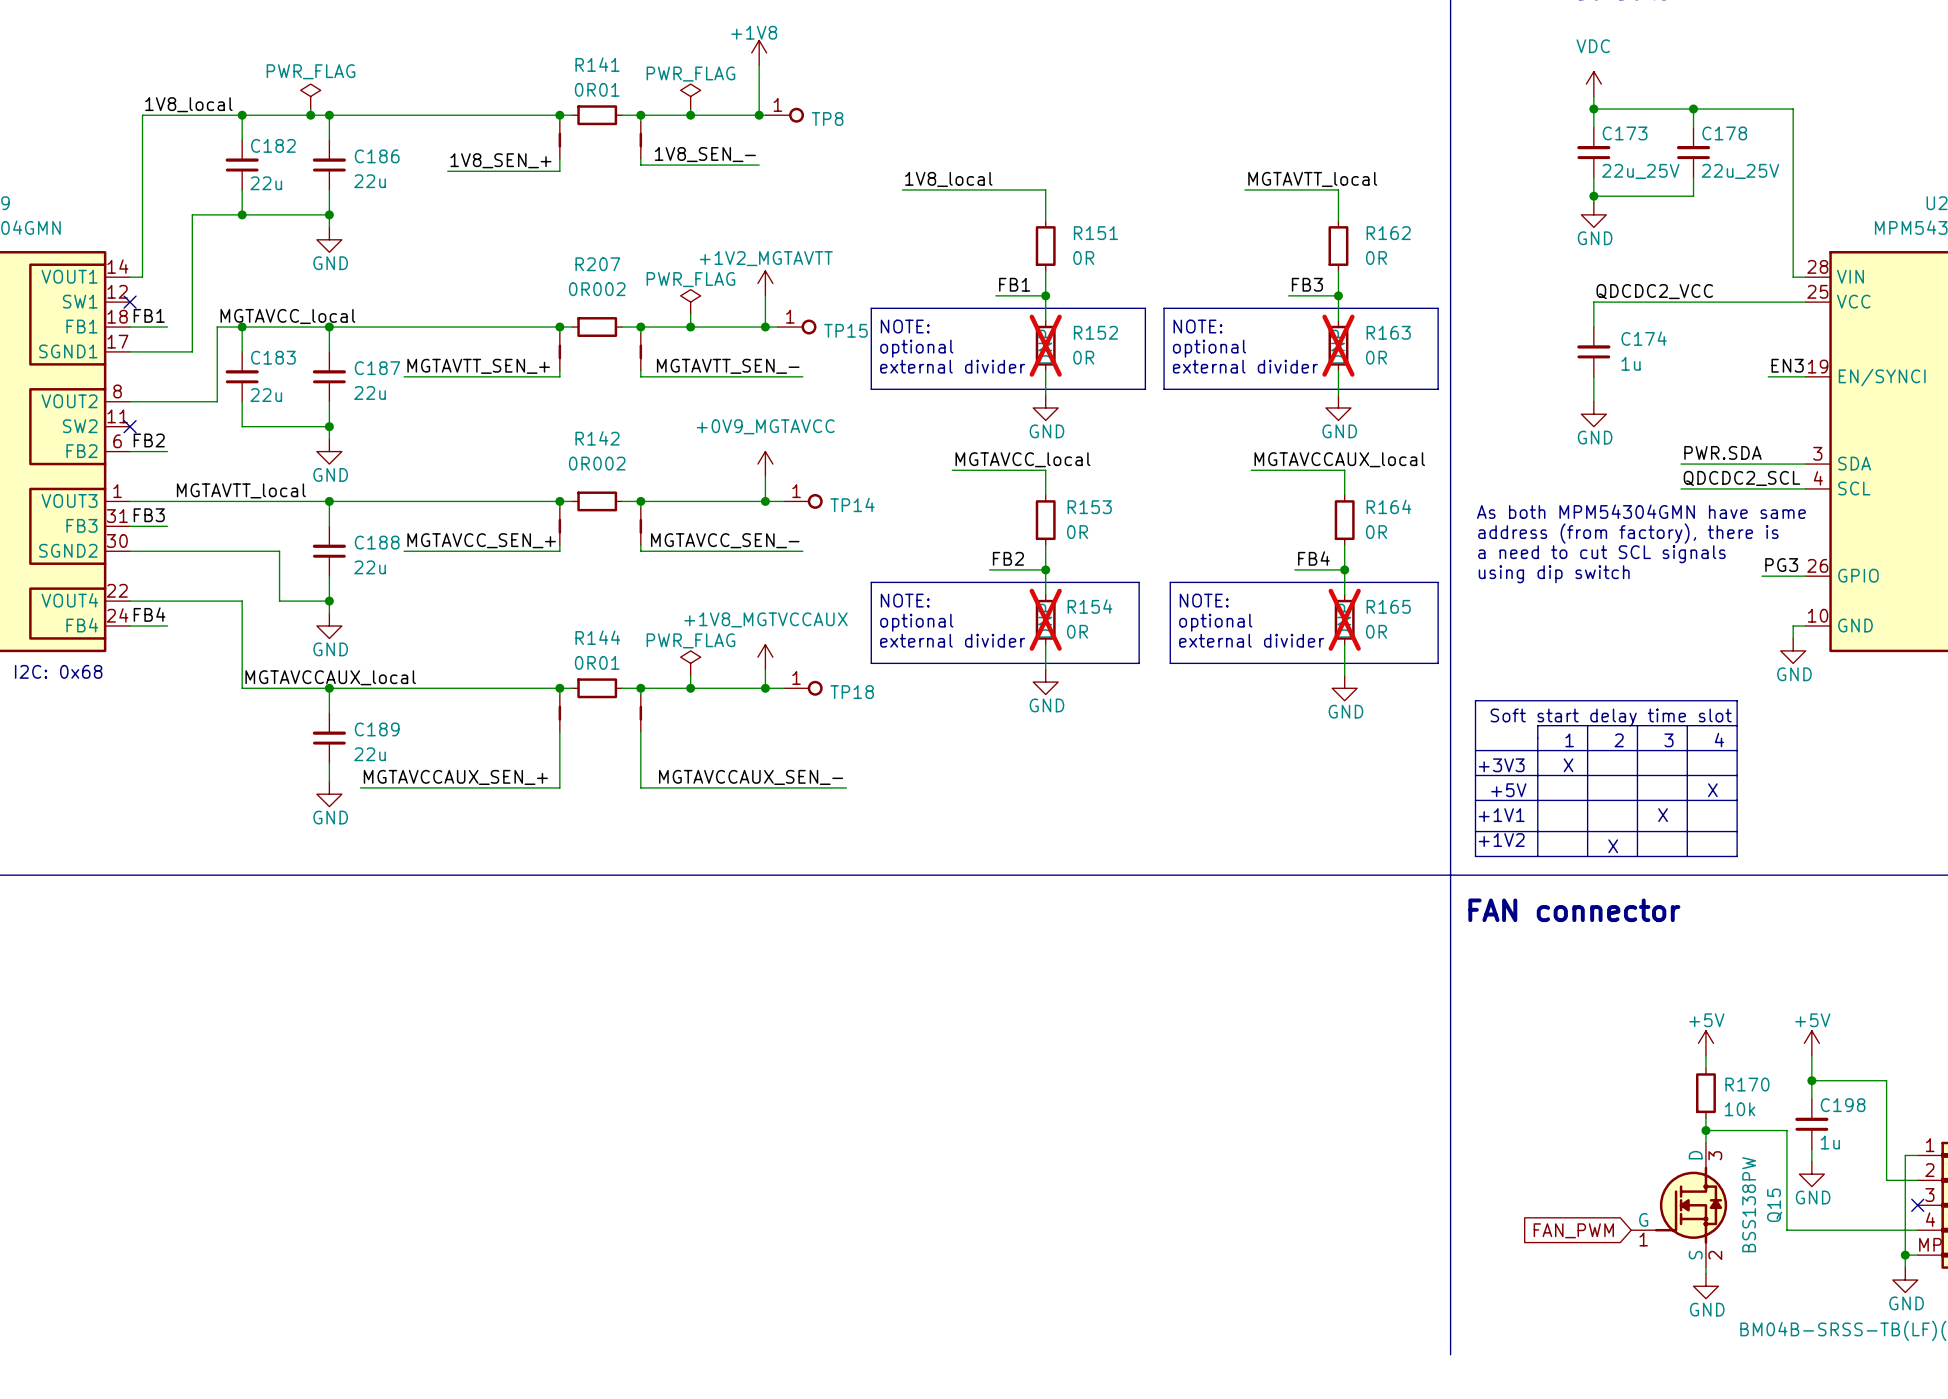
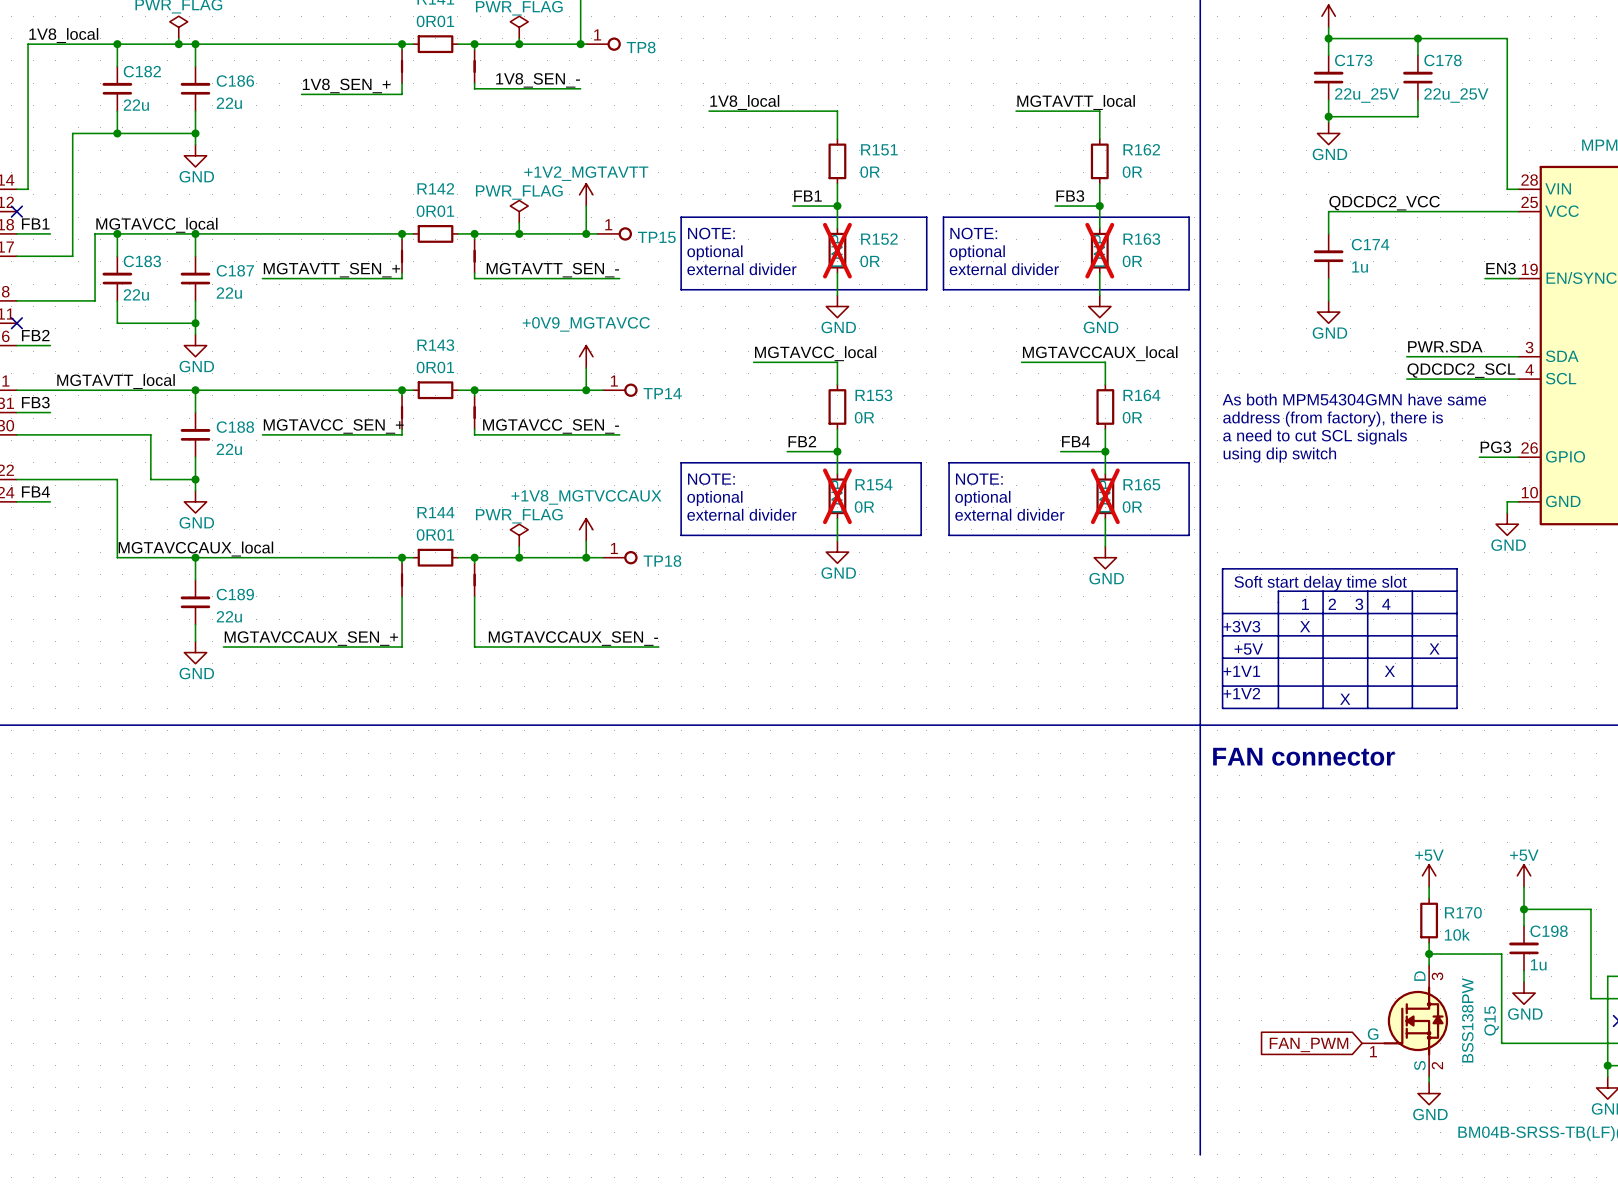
R207 name: R207 (597, 264) -> R142 (435, 188)
R207 text: 0R002 (597, 289) -> 0R01 (435, 211)
R142 name: R142 (597, 438) -> R143 (435, 345)
R142 text: 0R002 (597, 463) -> 0R01 (435, 367)

